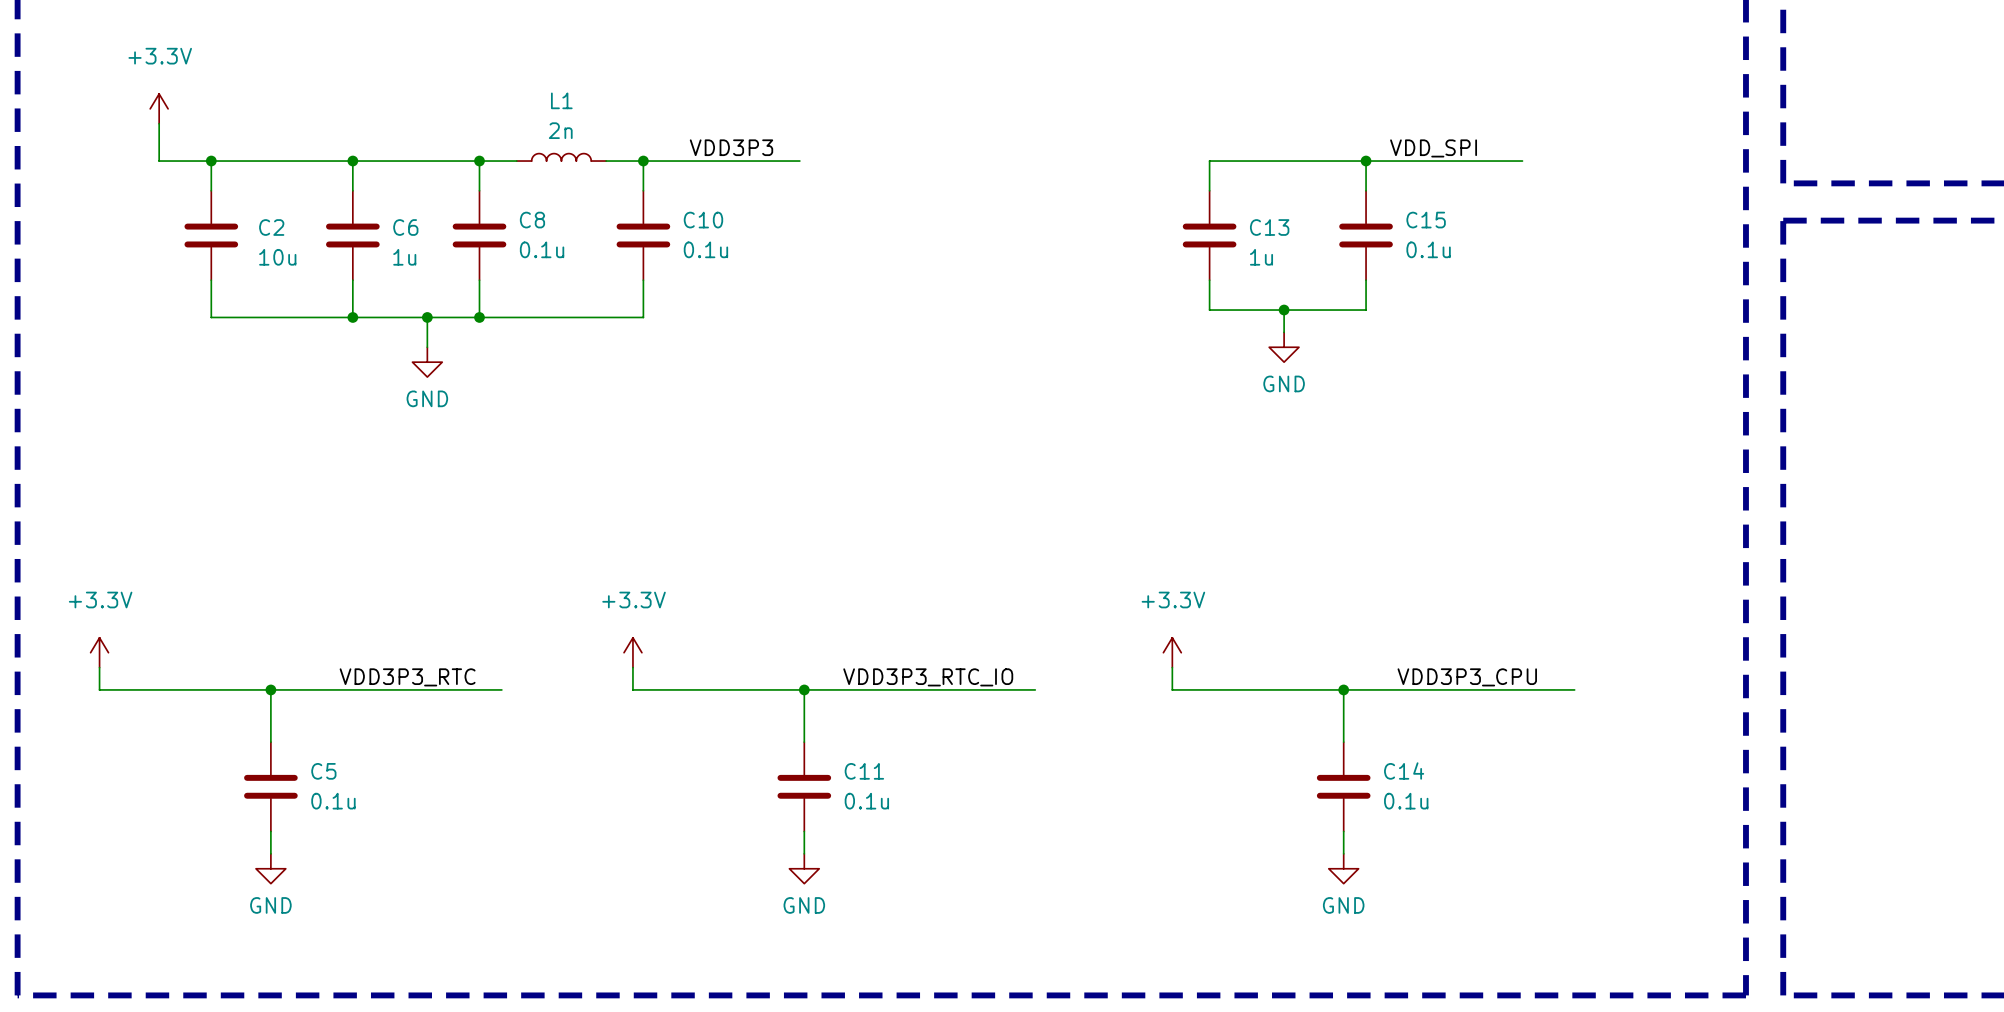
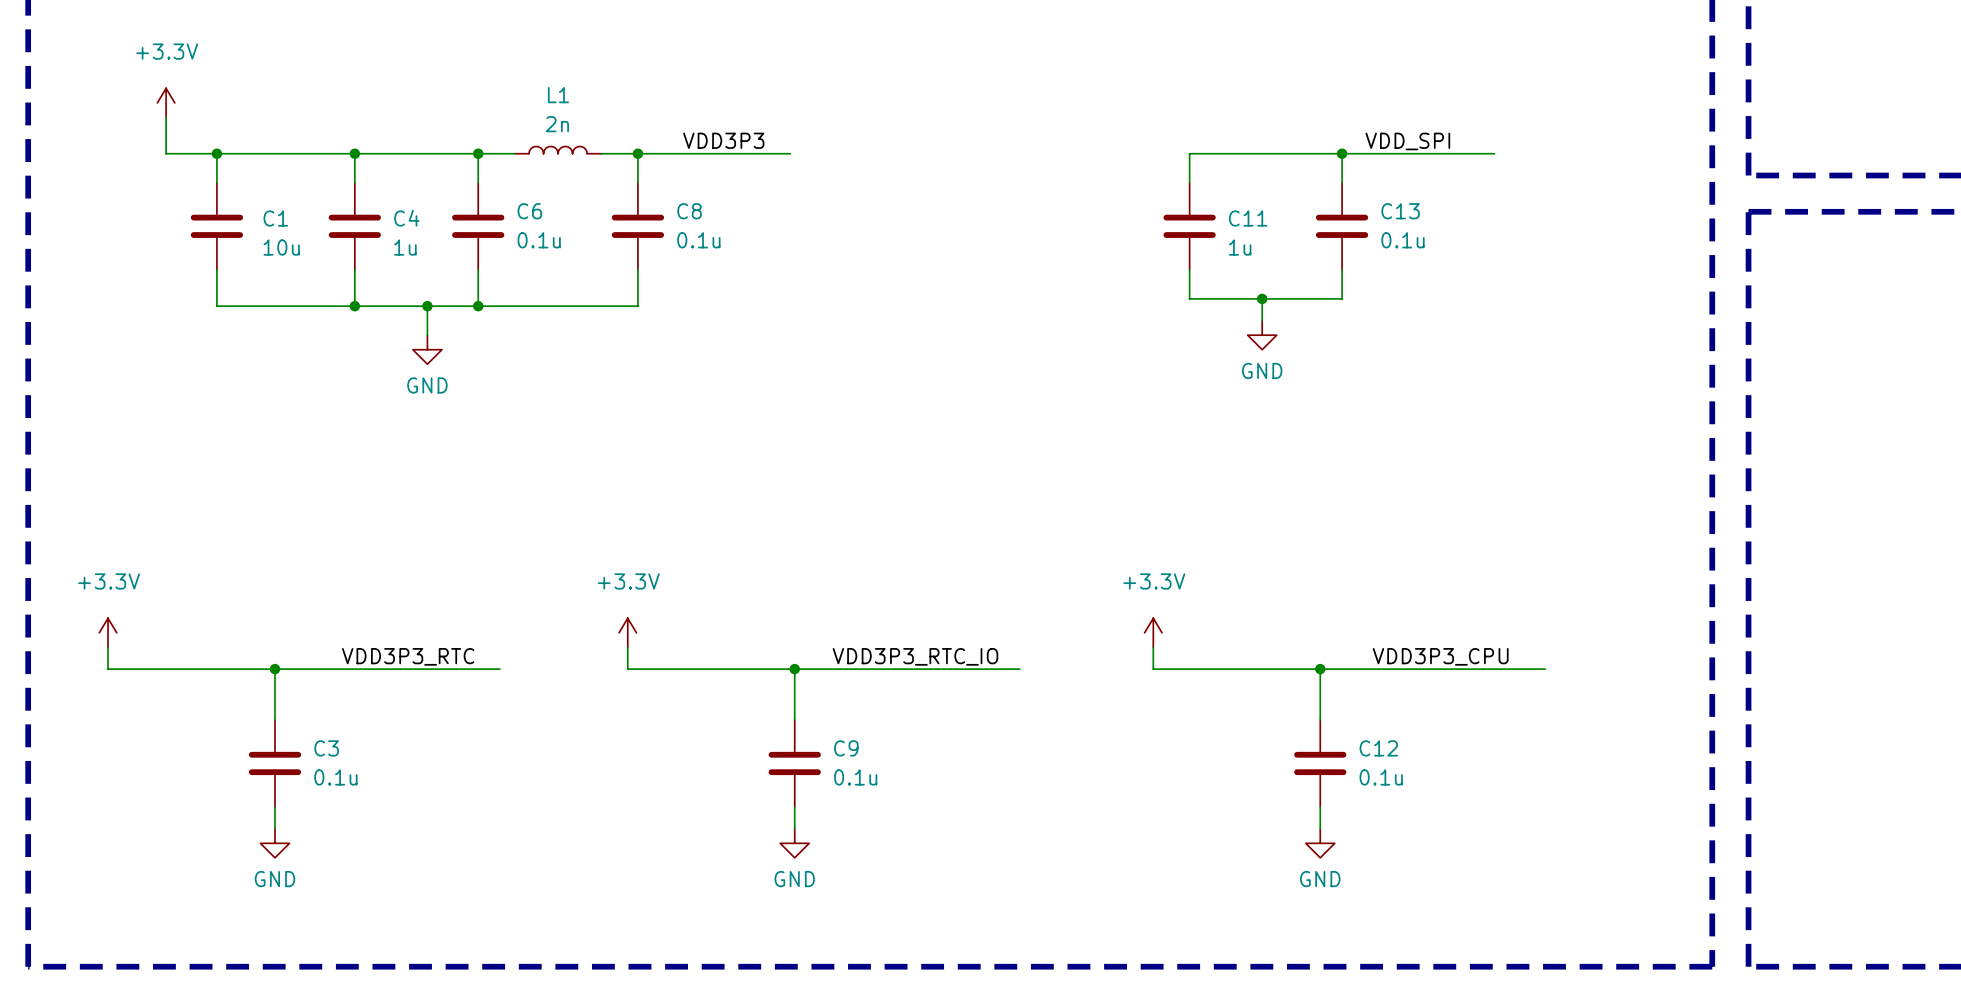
C8 name: C8 (532, 220) -> C6 (529, 211)
C10 name: C10 (703, 220) -> C8 (689, 211)
C15 name: C15 (1426, 220) -> C13 (1400, 211)
C2 name: C2 (271, 227) -> C1 (275, 218)
C6 name: C6 (405, 227) -> C4 (406, 218)
C13 name: C13 (1269, 227) -> C11 (1248, 218)
C5 name: C5 (323, 771) -> C3 (326, 748)
C11 name: C11 (864, 771) -> C9 (846, 748)
C14 name: C14 (1404, 771) -> C12 (1378, 748)

